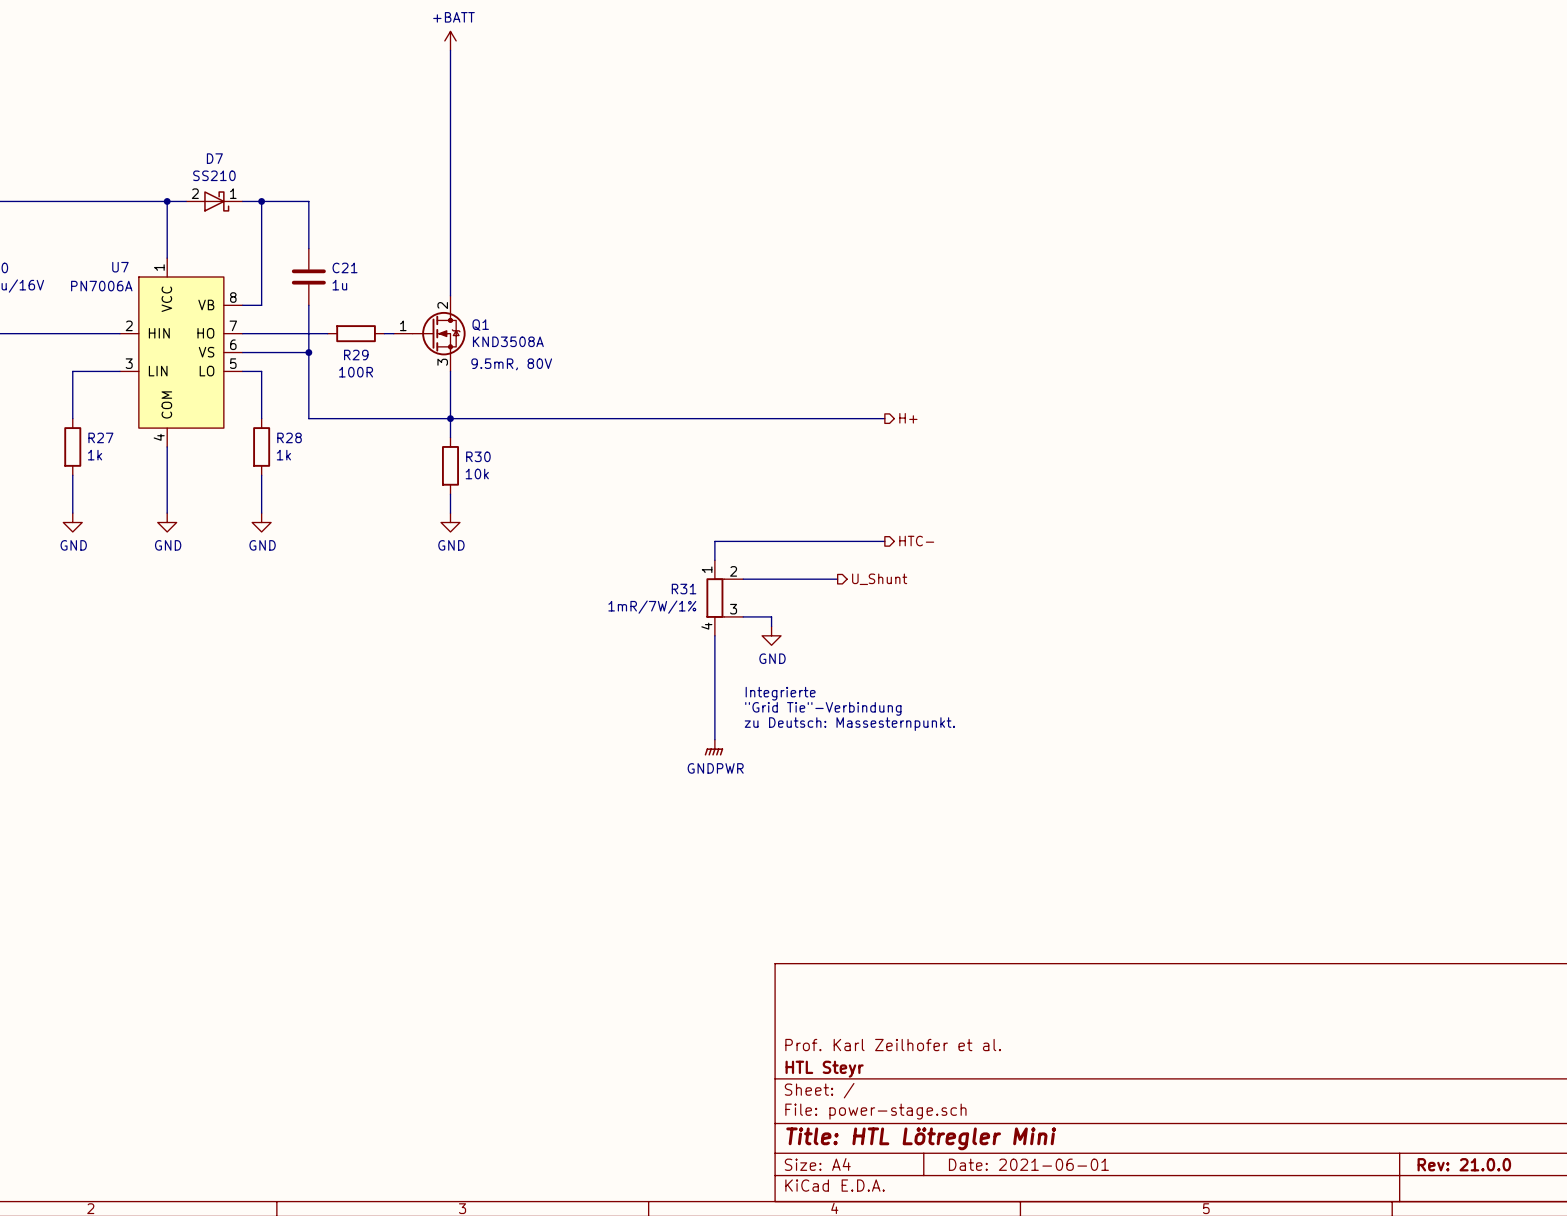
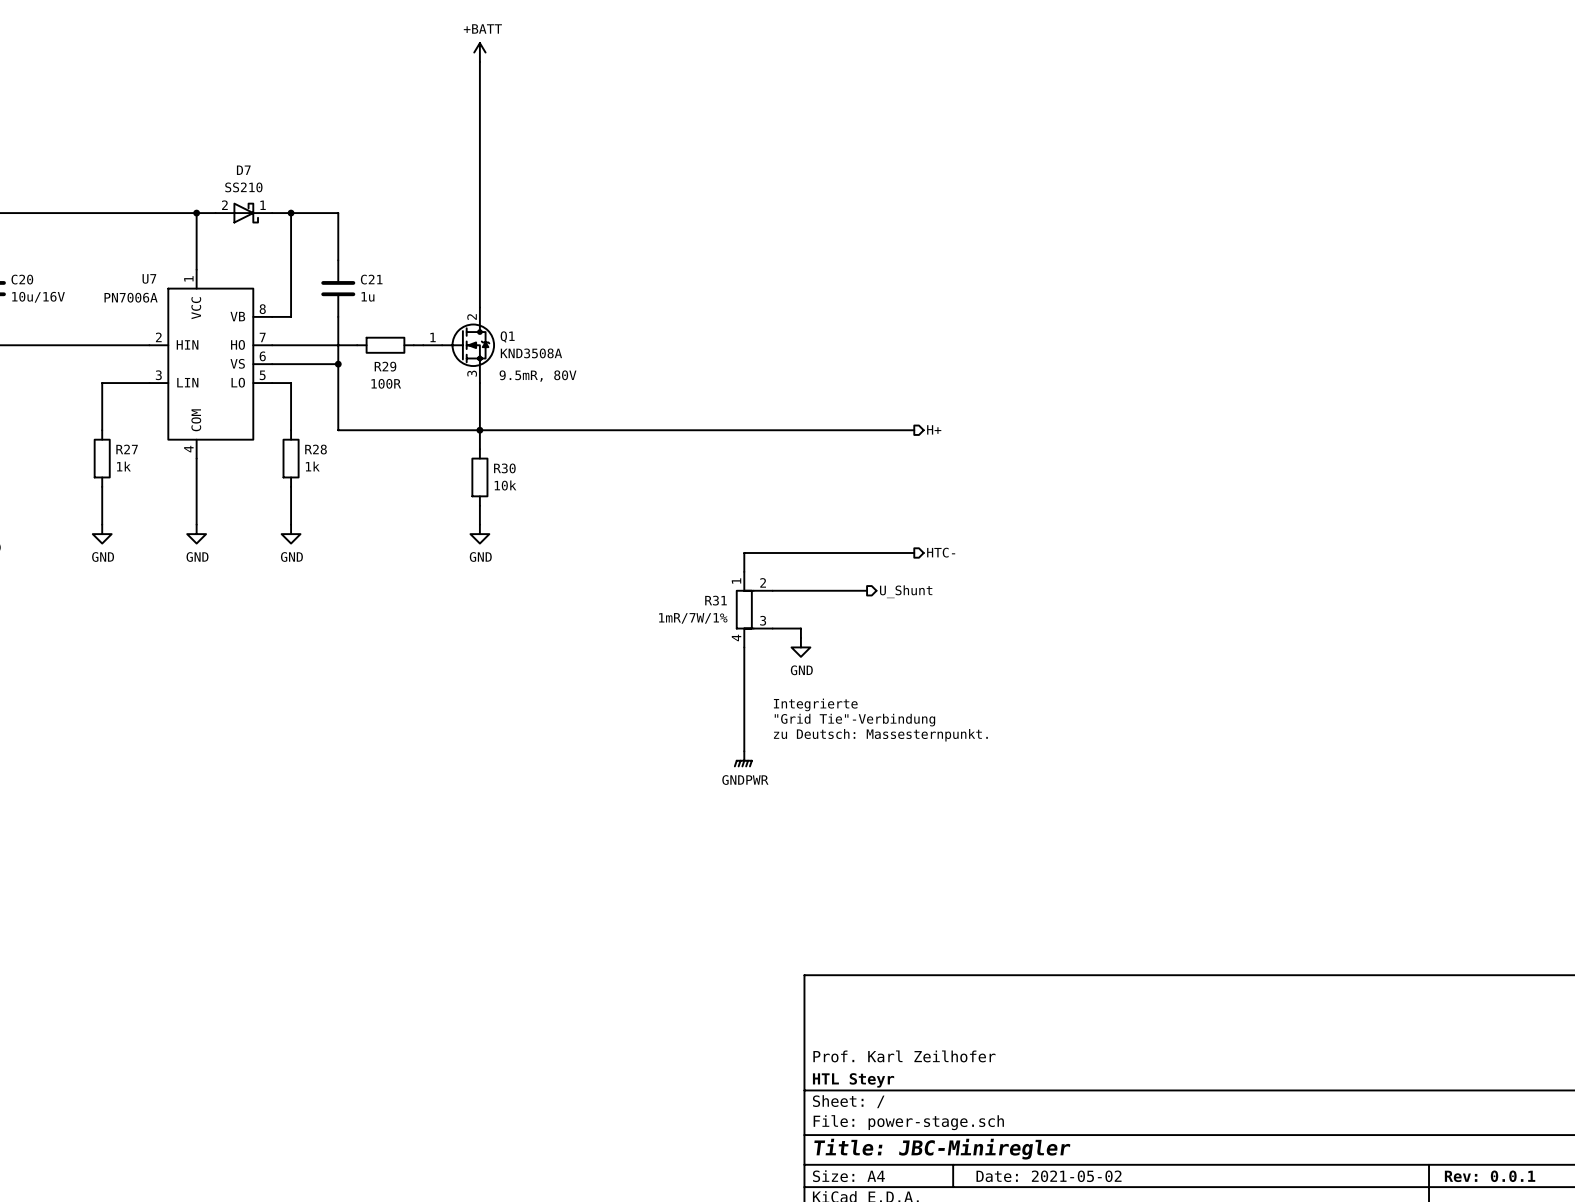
title block: Prof. Karl Zeilhofer et al. (893, 1045) -> Prof. Karl Zeilhofer (904, 1056)
title block: Title: HTL Lötregler Mini (921, 1138) -> Title: JBC-Miniregler (942, 1149)
title block: Date: 2021-06-01 (1028, 1164) -> Date: 2021-05-02 (1049, 1176)
title block: Rev: 21.0.0 (1464, 1164) -> Rev: 0.0.1 (1490, 1176)

